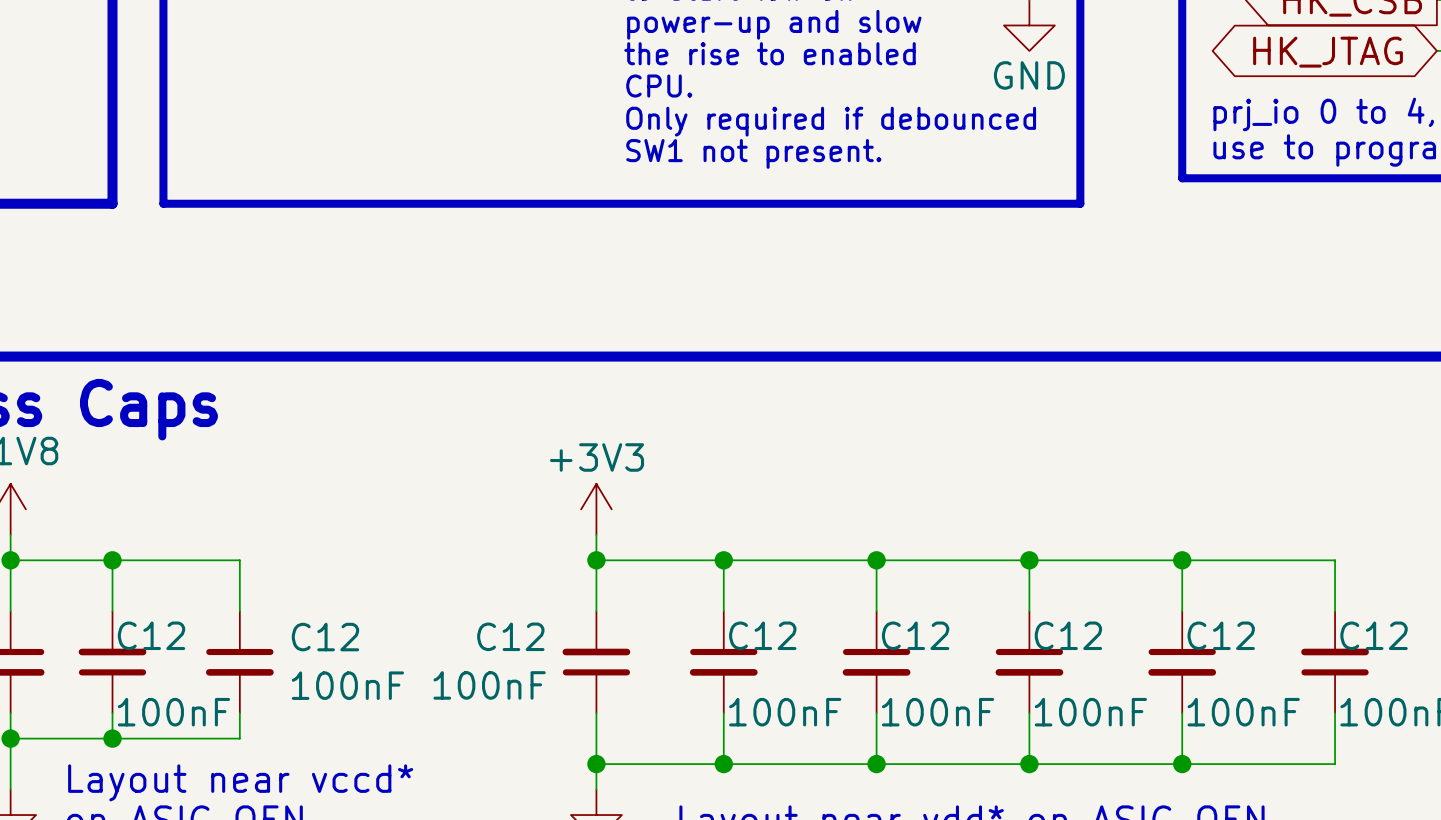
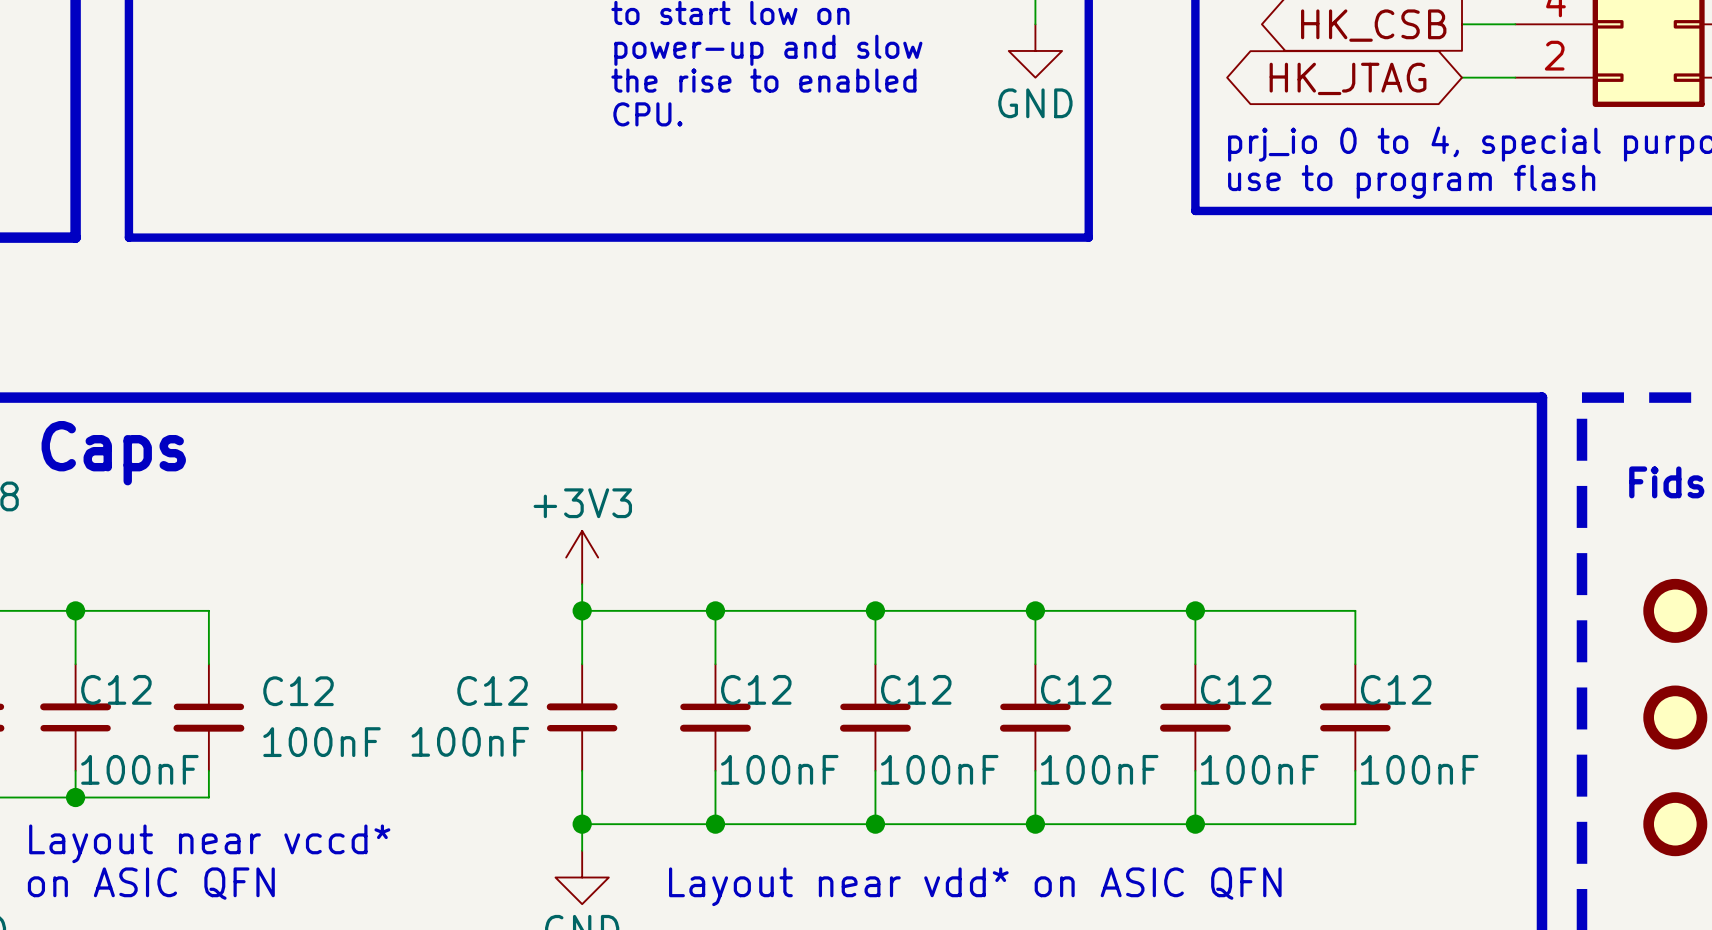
text: Only required if debounced (831, 121) -> none
text: SW1 not present. (753, 153) -> none

